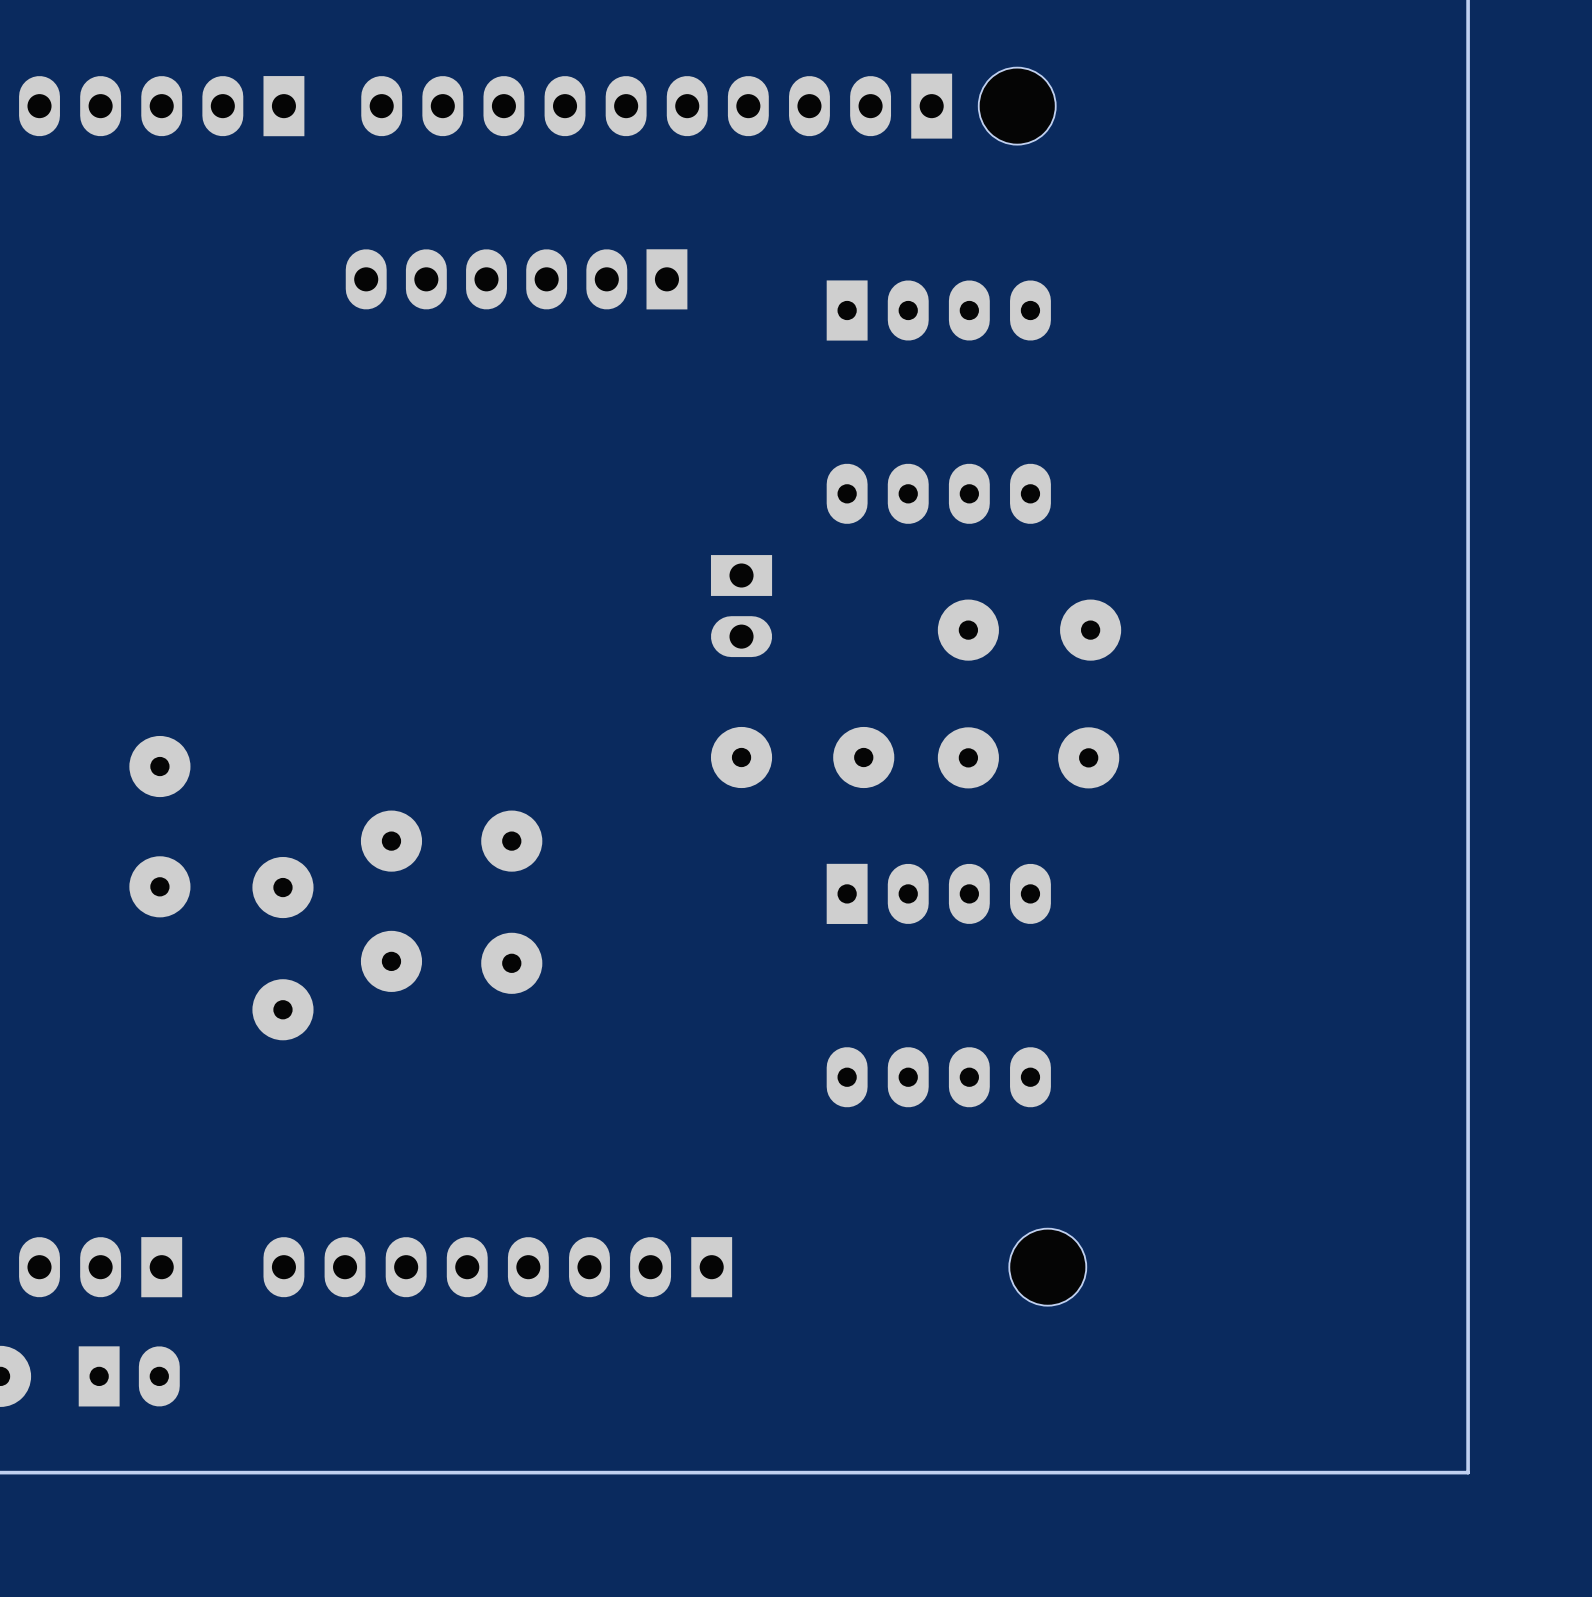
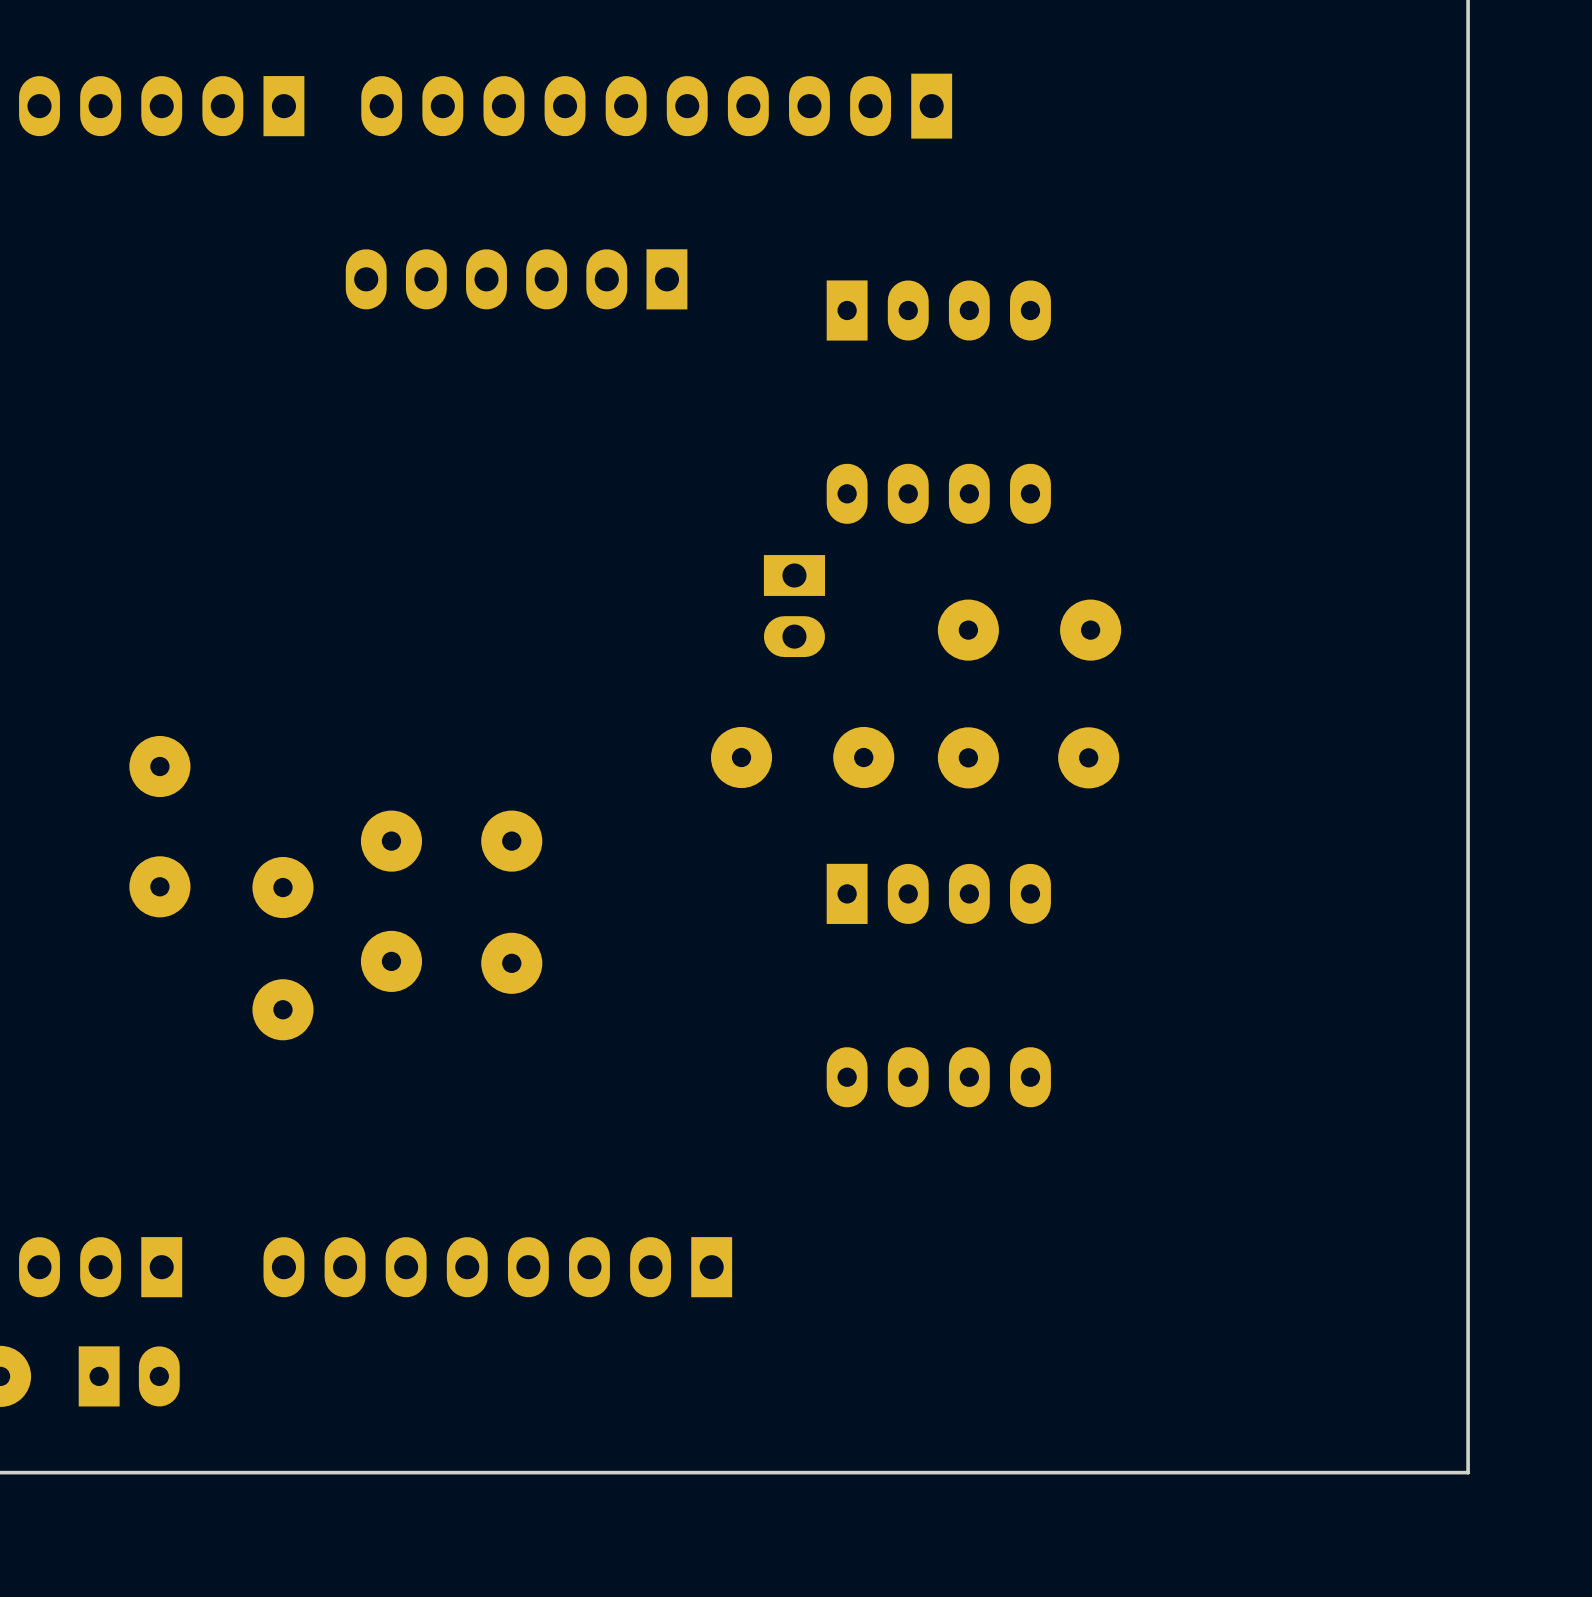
part: (1017, 106) -> none
part position: (741, 606) -> (794, 606)
part: (1047, 1267) -> none

